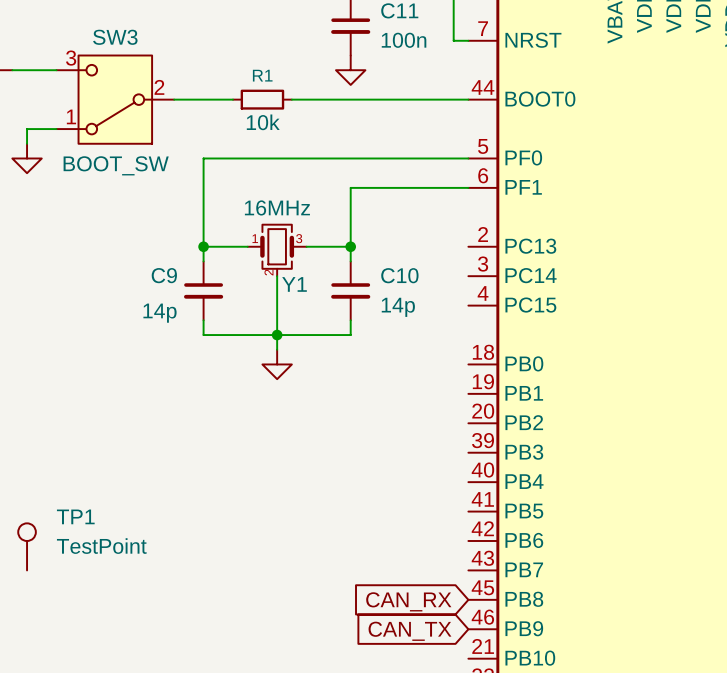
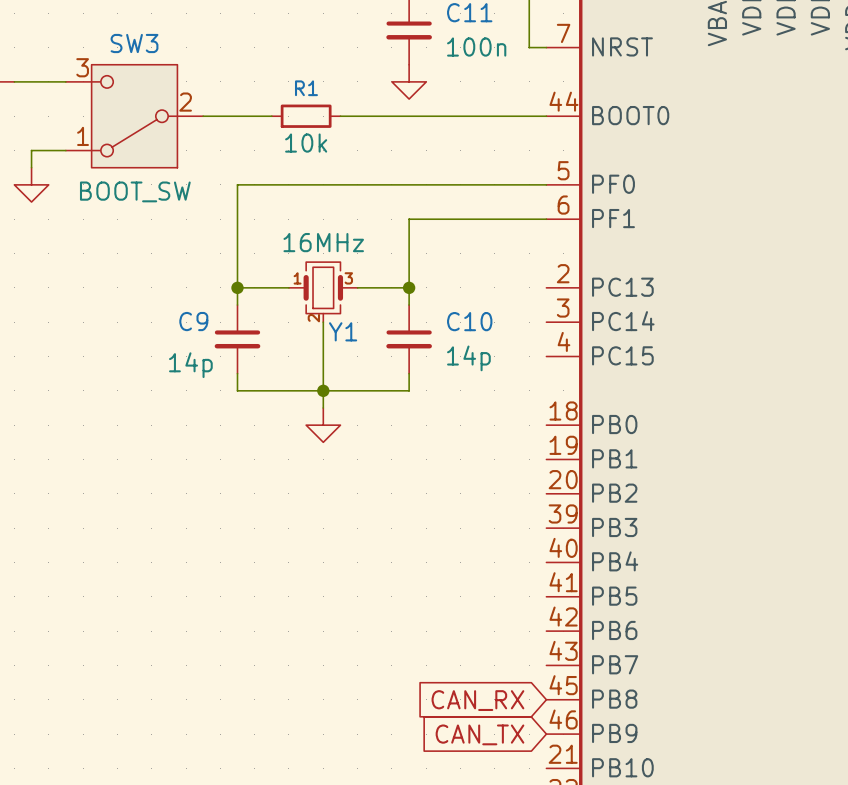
TP1: TestPoint (27, 546) -> none

